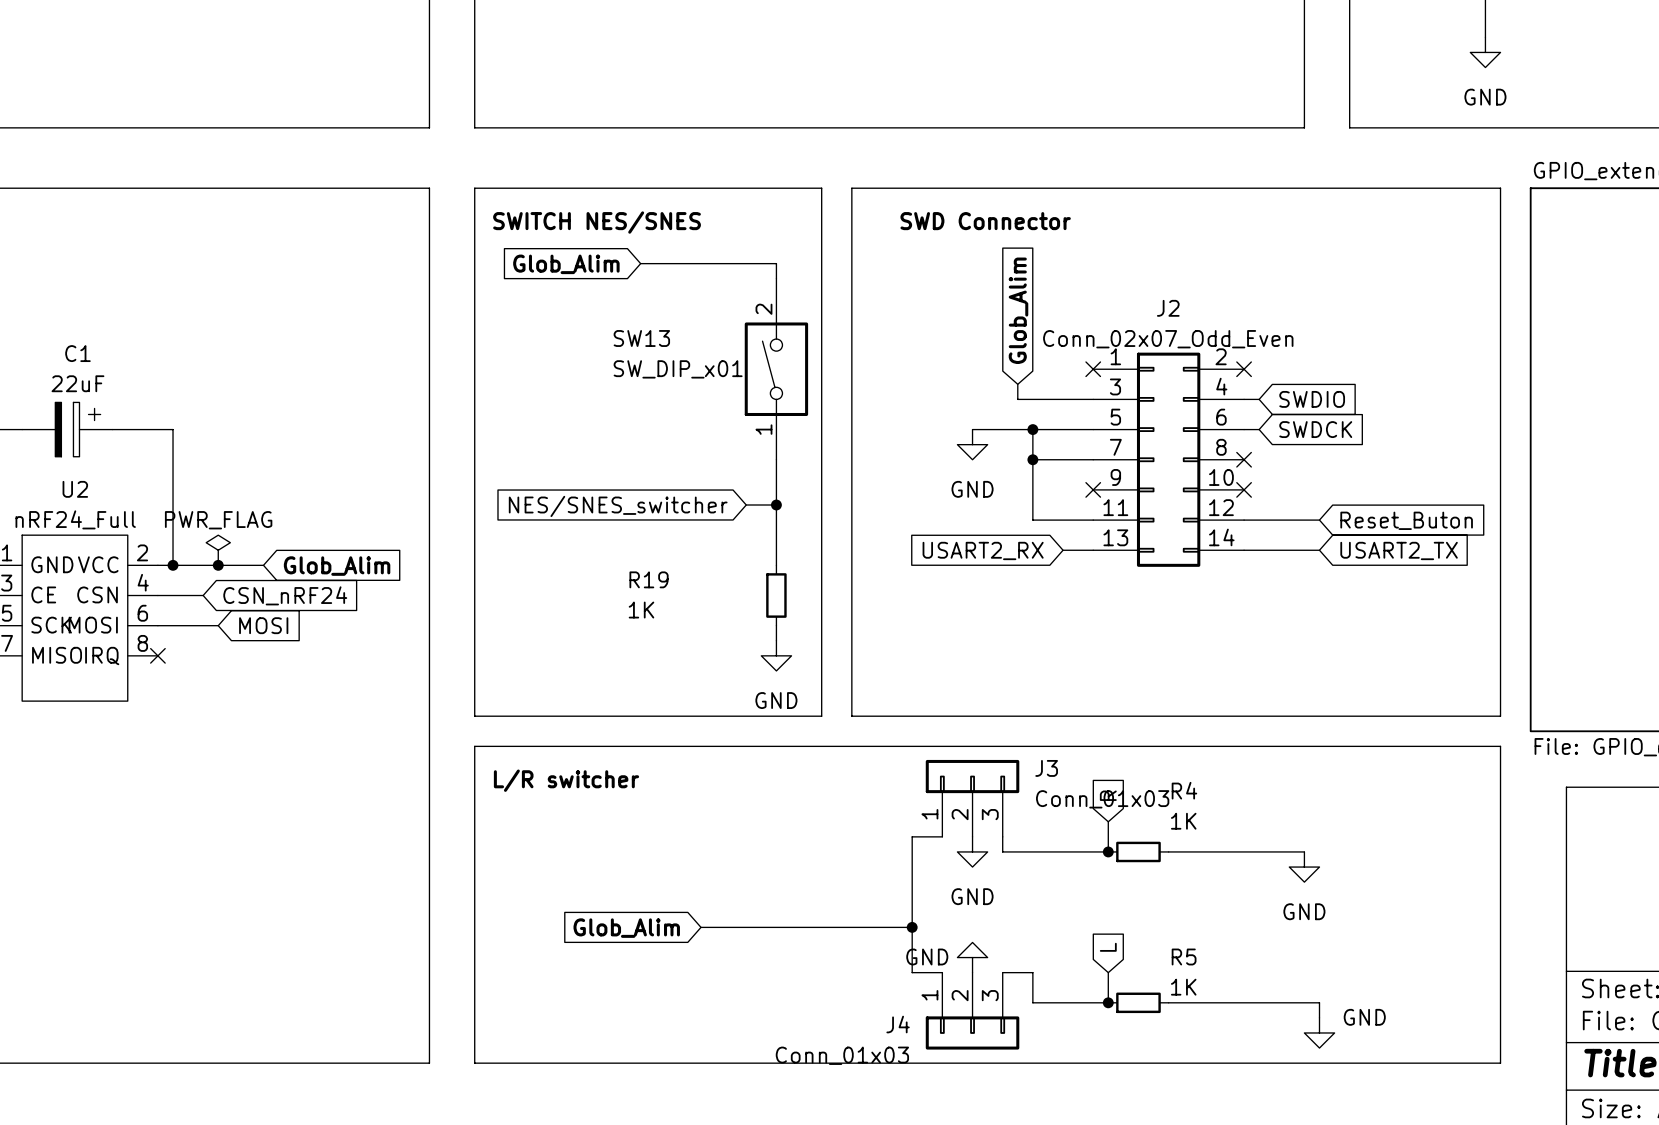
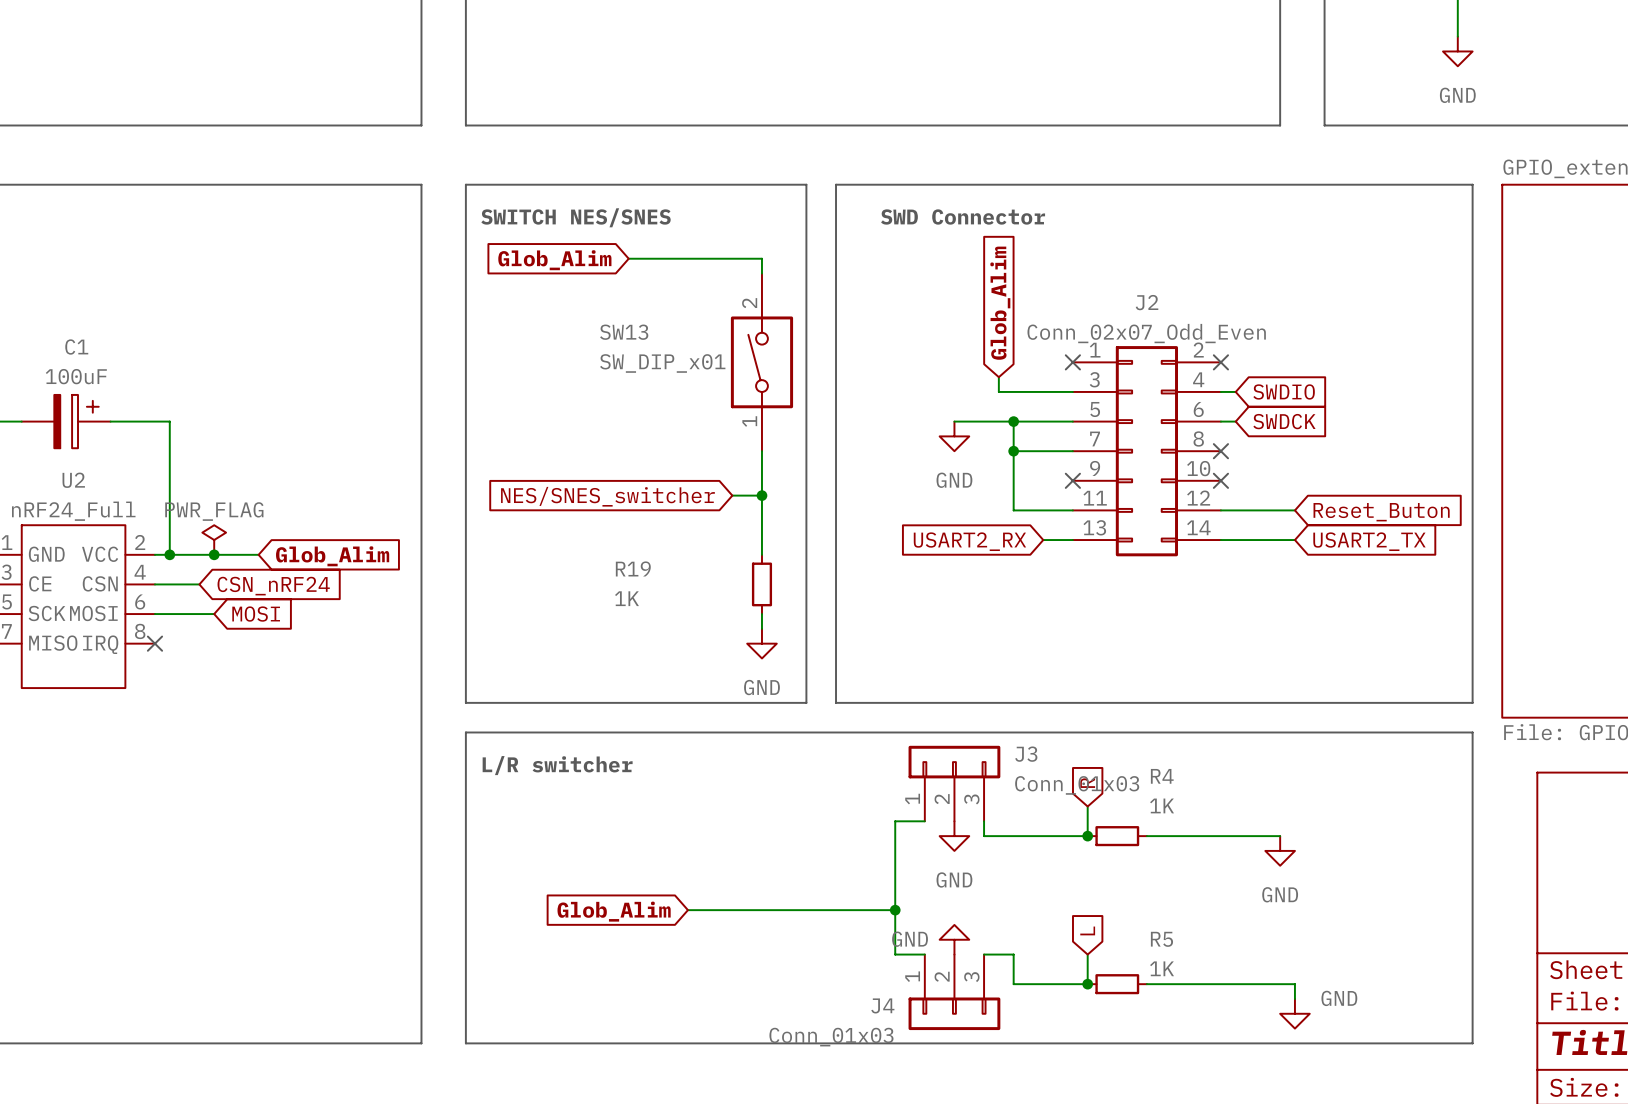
C1 value: 22uF (77, 383) -> 100uF (76, 376)

